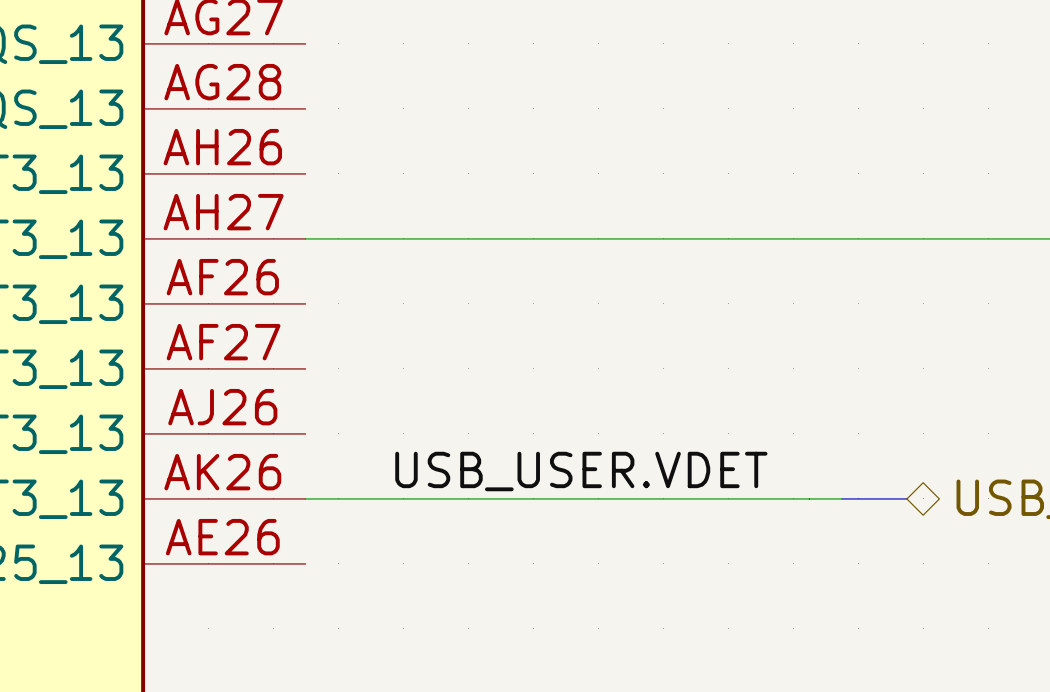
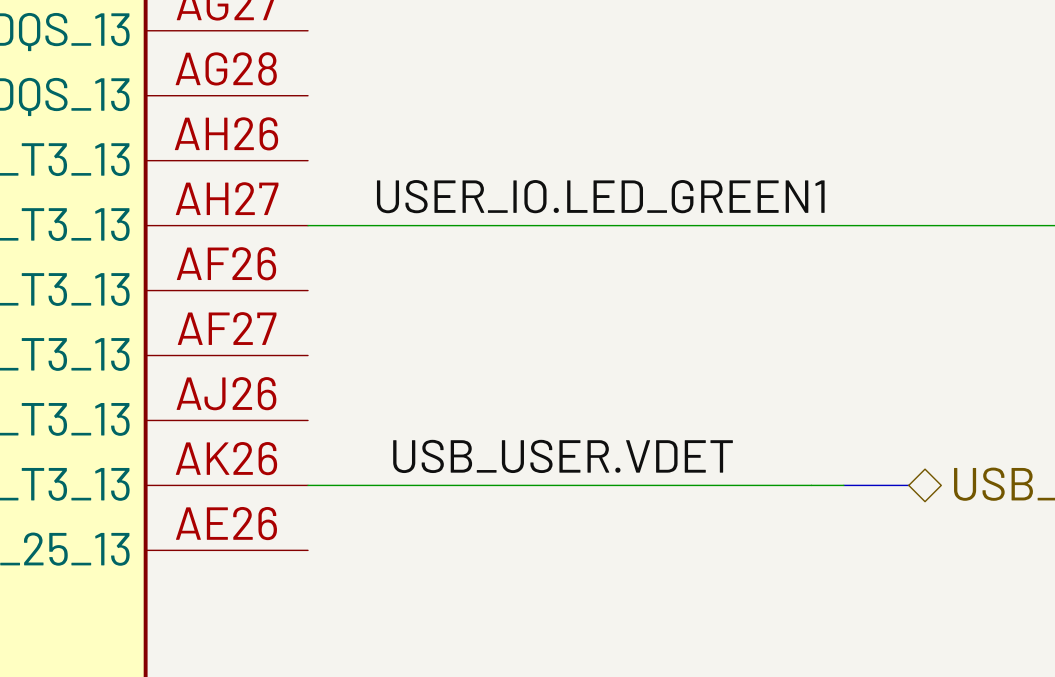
label: none -> USER_IO.LED_GREEN1 (600, 196)

